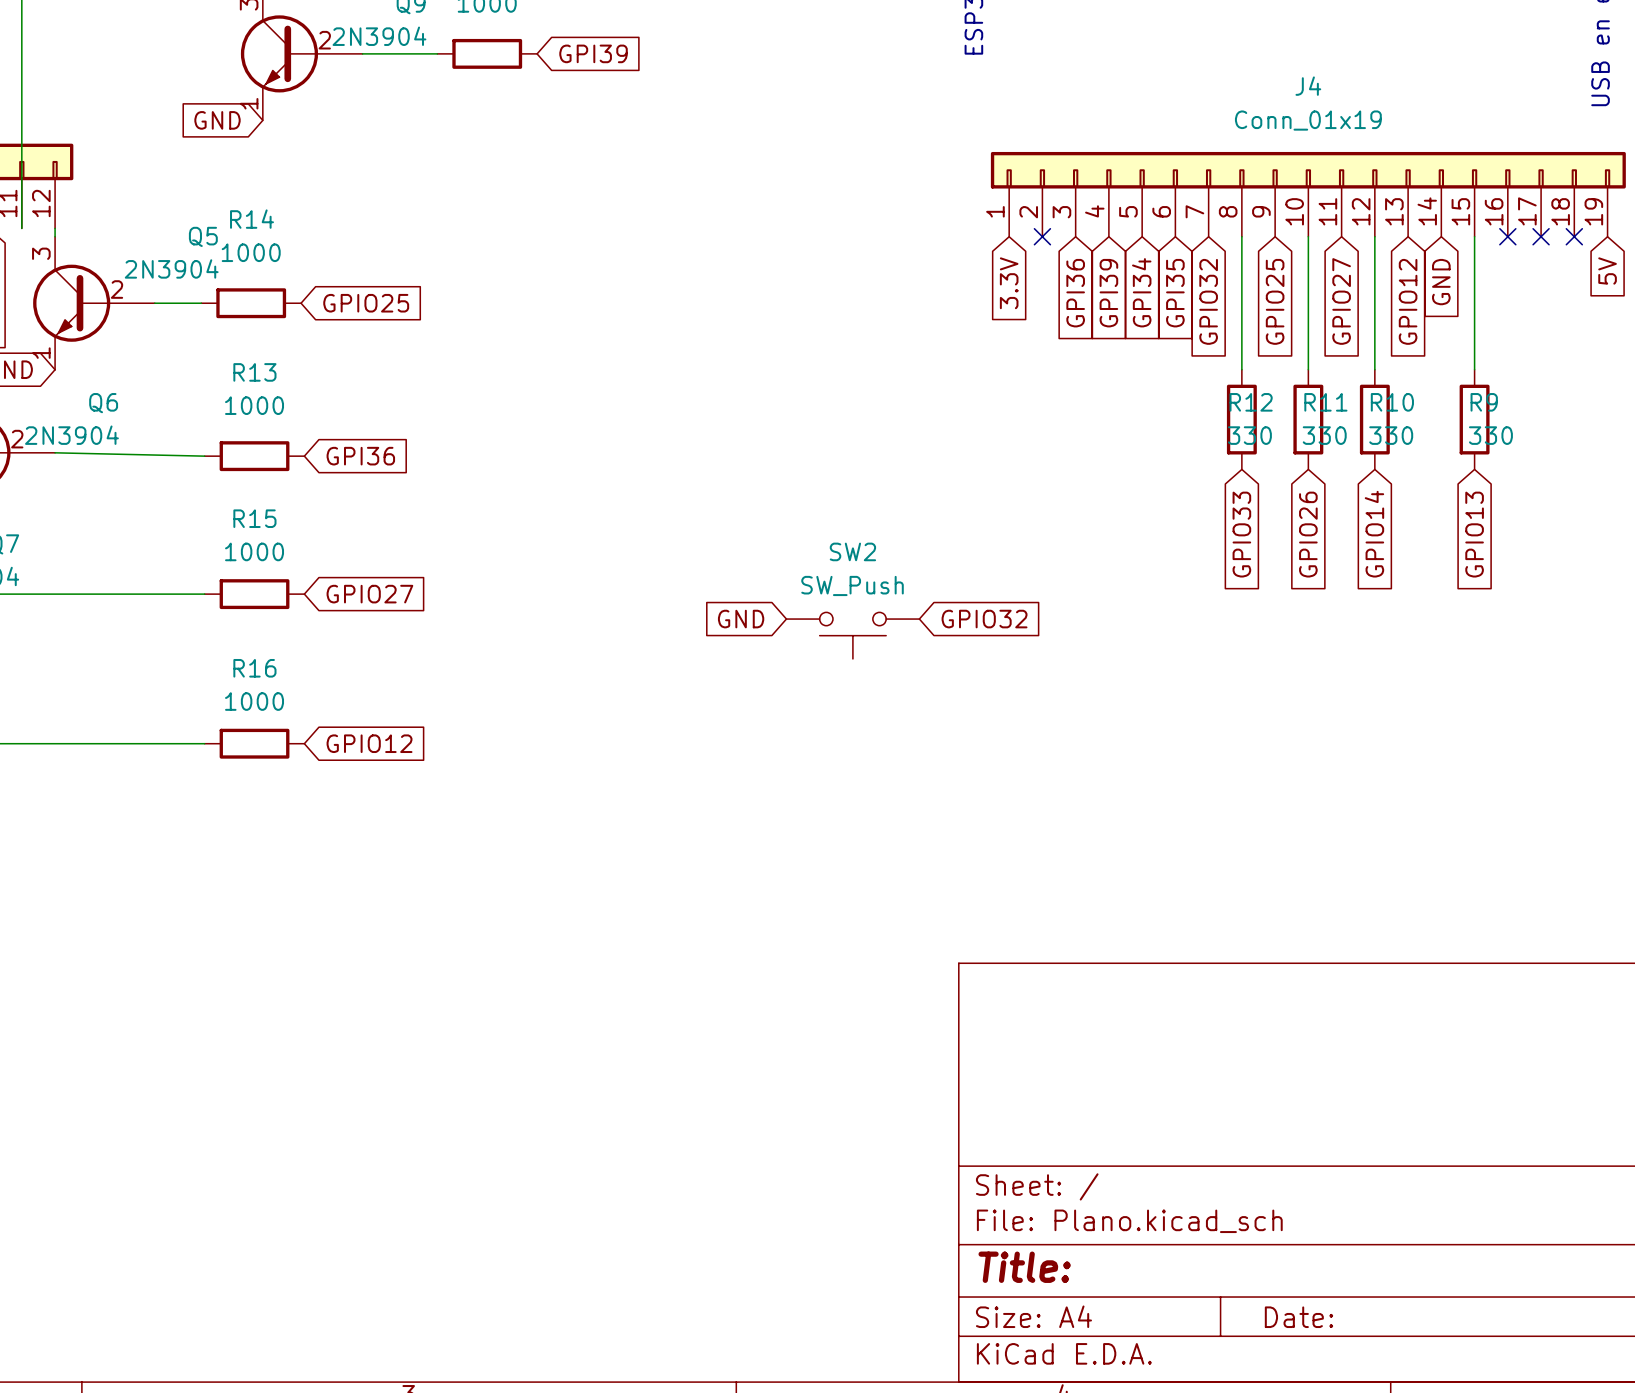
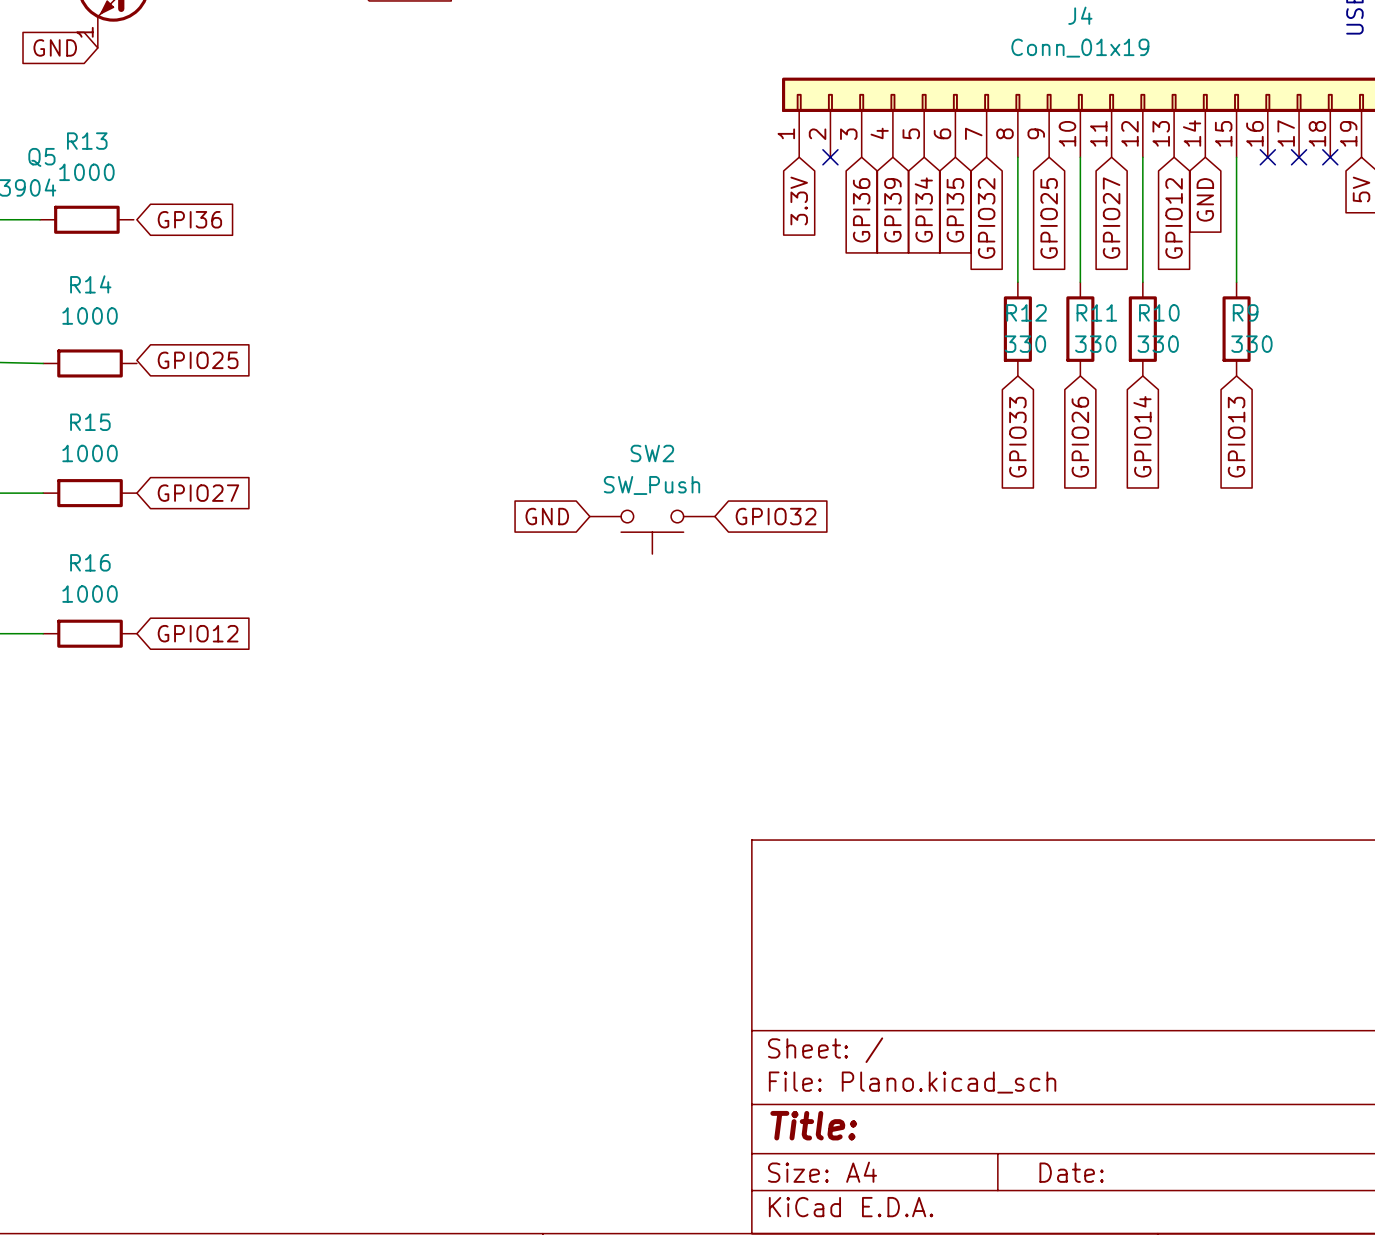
R14 name: R14 (251, 219) -> R13 (87, 141)
global label: GPIO25 (366, 303) -> GPI36 (189, 219)
R13 name: R13 (254, 372) -> R14 (90, 284)
global label: GPI36 (360, 456) -> GPIO25 (198, 360)

